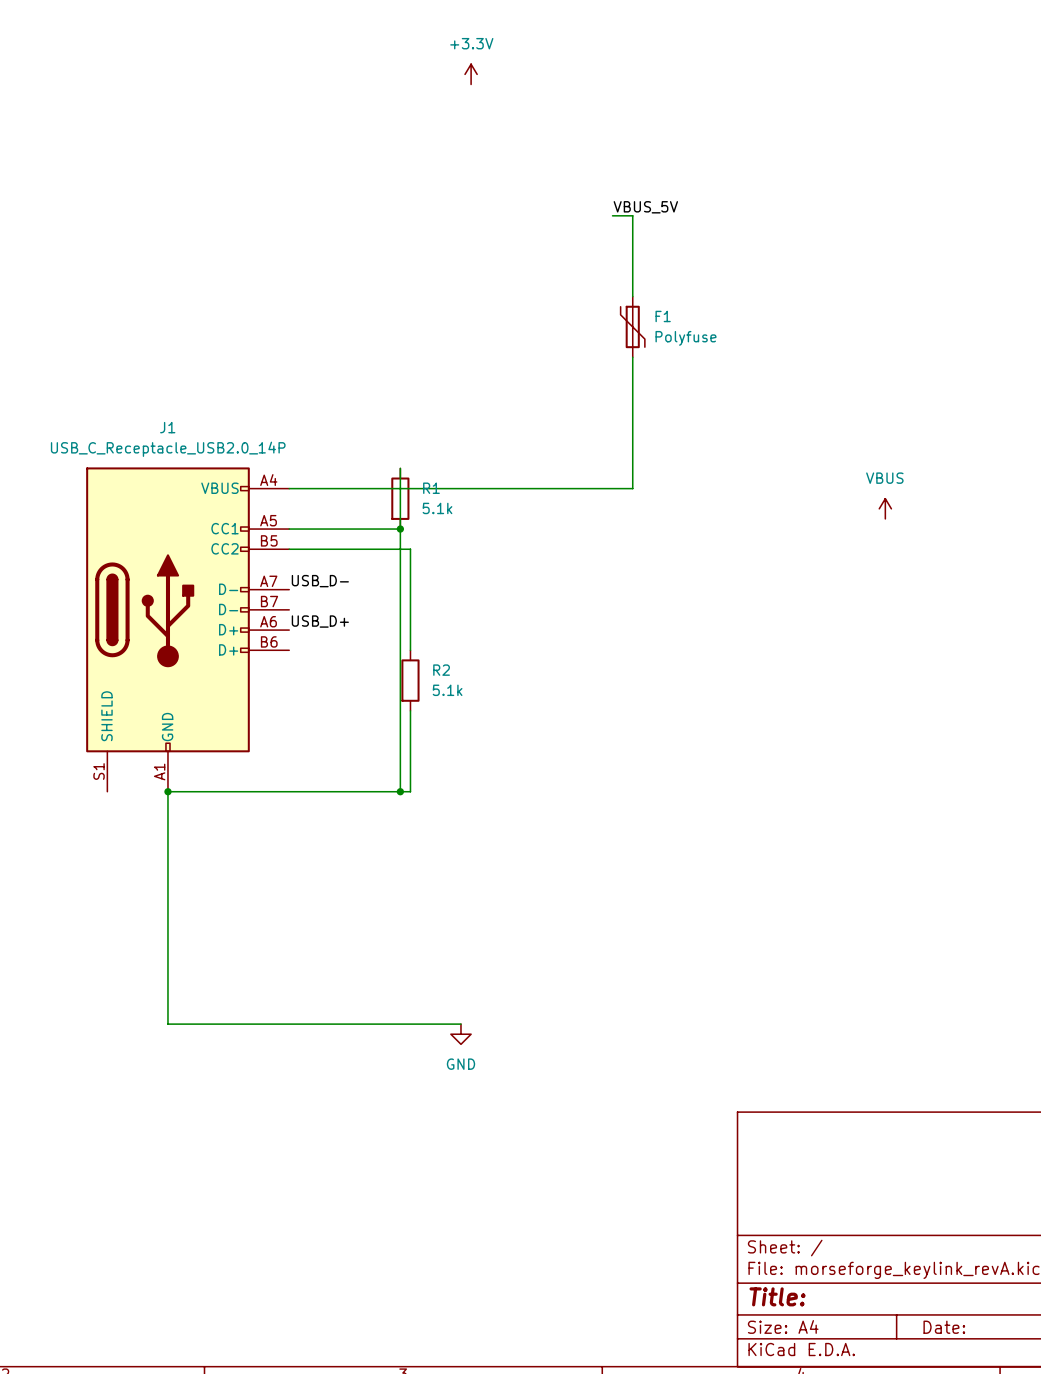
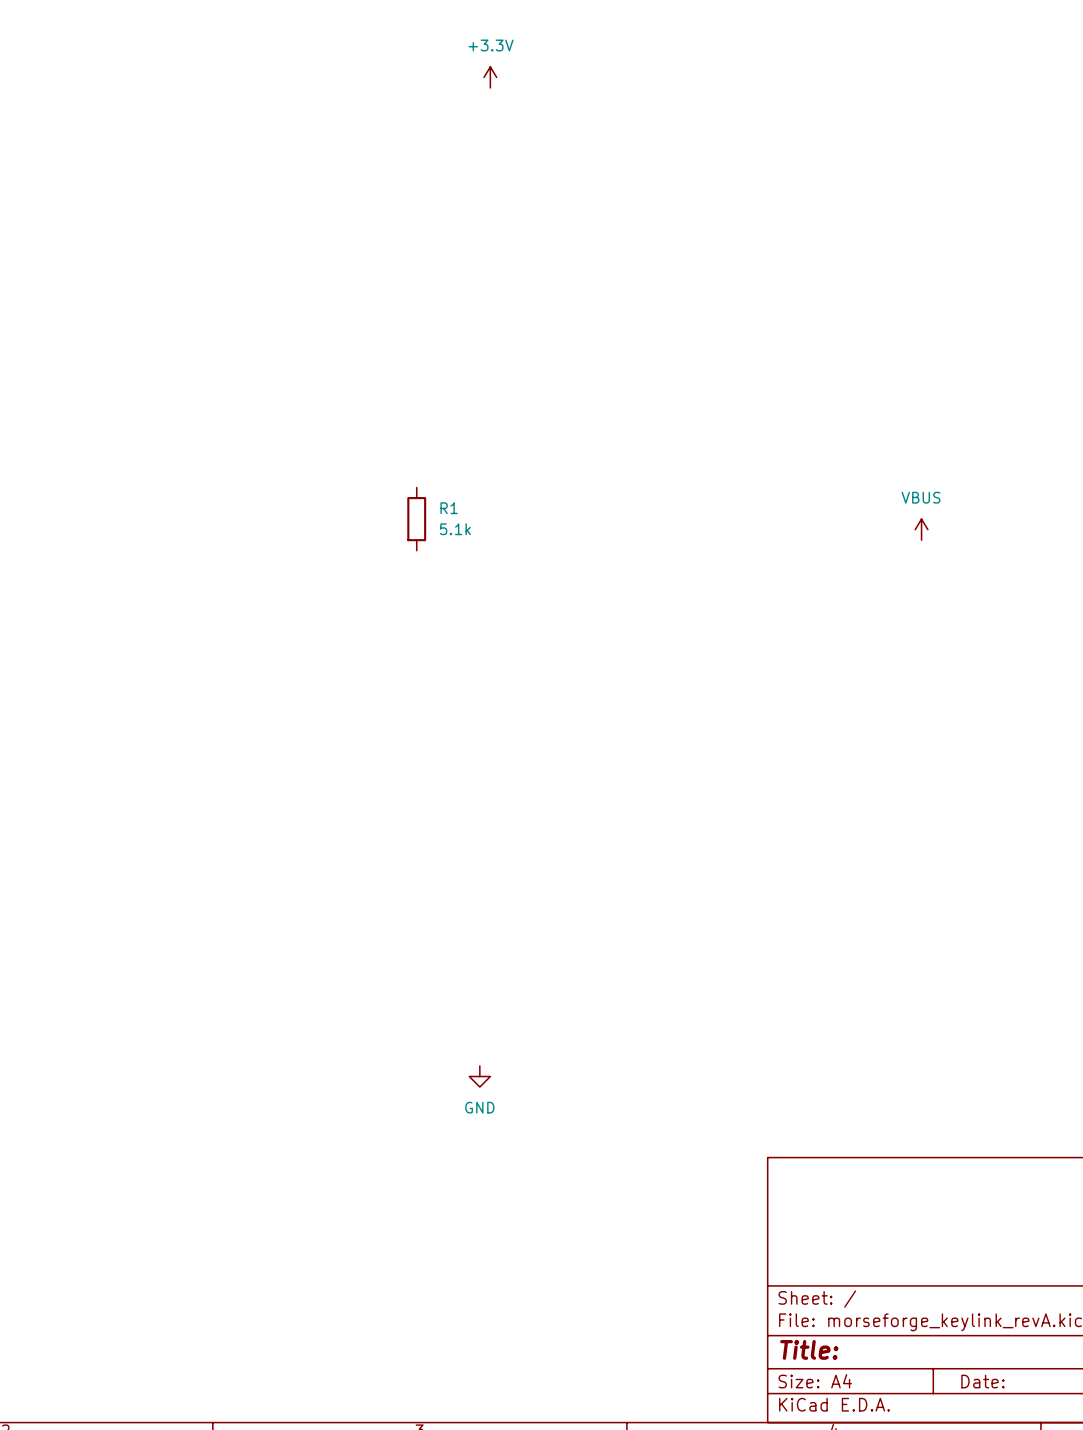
label: VBUS_5V (645, 207) -> none
wire: (612, 215) (632, 215) (632, 296) -> none
F1: Polyfuse (632, 326) -> none
wire: (632, 357) (632, 488) (289, 488) -> none
wire: (400, 468) (400, 791) -> none
wire: (289, 529) (400, 529) -> none
junction: (400, 529) -> none
wire: (289, 549) (410, 549) (410, 650) -> none
label: USB_D- (320, 581) -> none
label: USB_D+ (320, 621) -> none
J1: USB_C_Receptacle_USB2.0_14P (187, 629) -> none
R2: 5.1k (410, 680) -> none
wire: (410, 710) (410, 791) (167, 791) (167, 1024) (460, 1024) -> none
junction: (167, 791) -> none
junction: (400, 791) -> none

